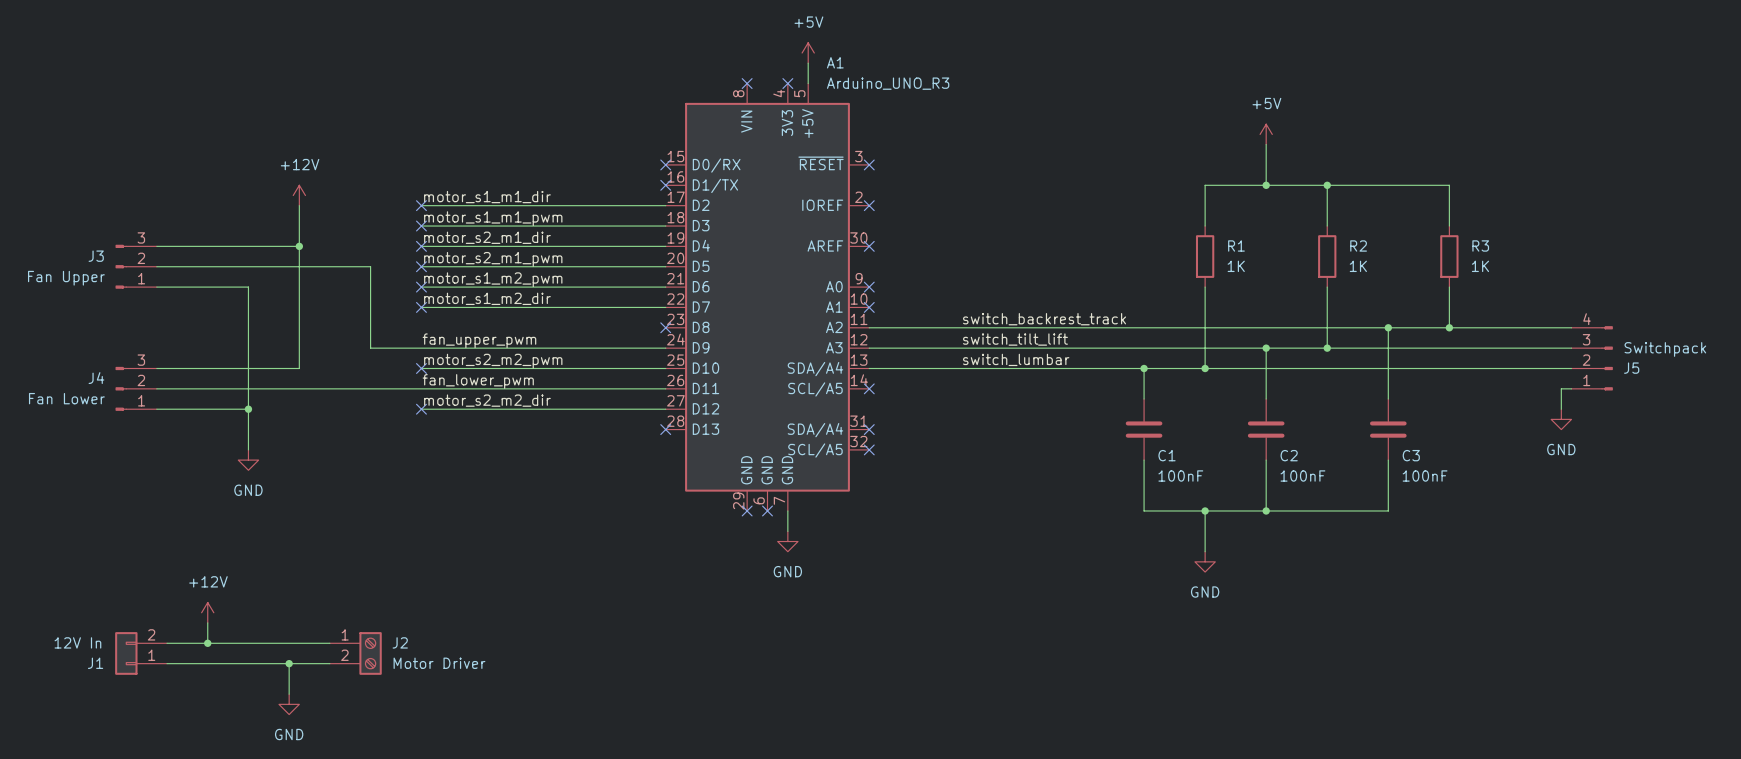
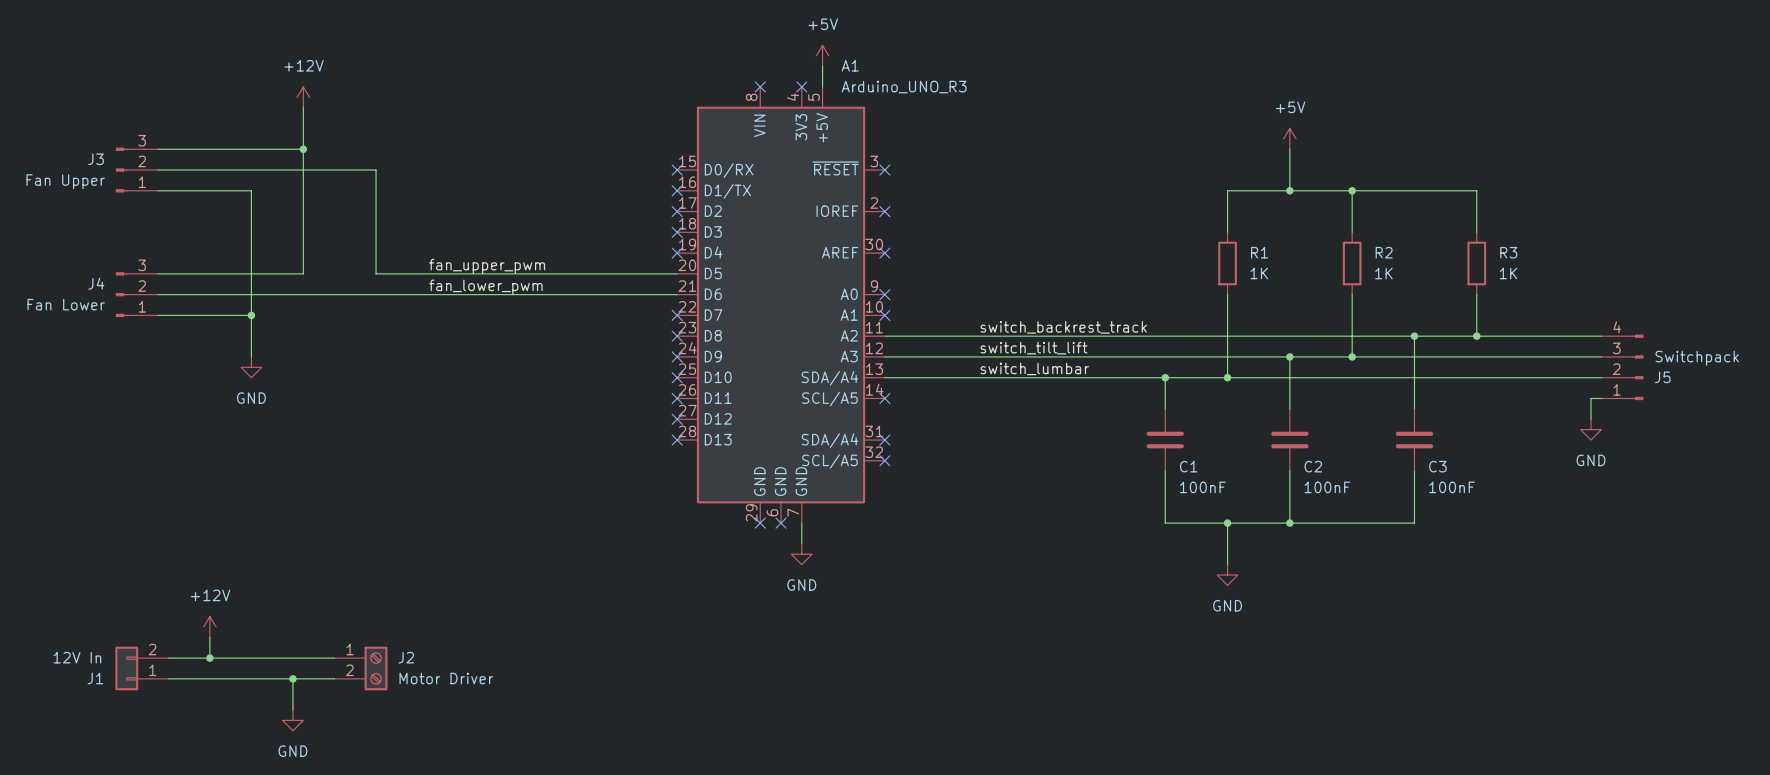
wire: none -> (303, 107) (303, 211)
junction: none -> (303, 149)
wire: none -> (157, 170) (376, 170) (376, 273) (427, 273)
wire: none -> (157, 190) (251, 190) (251, 294) (427, 294)
power symbol position: +12V (299, 195) -> +12V (303, 97)
label: motor_s1_m1_dir (487, 197) -> none
wire: (421, 205) (665, 205) -> none
no-connect mark: (421, 205) -> none
no-connect mark: none -> (677, 211)
label: motor_s1_m1_pwm (493, 218) -> none
wire: (421, 226) (665, 226) -> none
no-connect mark: (421, 226) -> none
no-connect mark: none -> (677, 232)
label: motor_s2_m1_dir (487, 237) -> none
wire: (156, 246) (299, 246) -> (157, 149) (303, 149)
junction: (299, 246) -> none
wire: (421, 246) (665, 246) -> none
no-connect mark: (421, 246) -> none
no-connect mark: none -> (677, 253)
label: motor_s2_m1_pwm (493, 259) -> fan_upper_pwm (487, 266)
J3 position: (136, 266) -> (136, 170)
no-connect mark: (421, 266) -> none
label: motor_s1_m2_pwm (493, 279) -> fan_lower_pwm (485, 287)
no-connect mark: (421, 287) -> none
label: motor_s1_m2_dir (487, 298) -> none
junction: none -> (251, 315)
wire: (421, 307) (665, 307) -> none
no-connect mark: (421, 307) -> none
no-connect mark: none -> (677, 315)
label: fan_upper_pwm (479, 340) -> none
wire: (248, 348) (248, 449) -> none
wire: (665, 348) (370, 348) (370, 266) (299, 266) (299, 368) (156, 368) -> none
no-connect mark: none -> (677, 356)
label: motor_s2_m2_pwm (493, 361) -> none
wire: (421, 368) (665, 368) -> none
no-connect mark: (421, 368) -> none
no-connect mark: none -> (677, 377)
label: fan_lower_pwm (478, 381) -> none
J4 position: (136, 388) -> (136, 294)
wire: (156, 388) (665, 388) -> none
no-connect mark: none -> (677, 398)
label: motor_s2_m2_dir (487, 400) -> none
wire: (156, 409) (248, 409) -> (157, 315) (251, 315)
junction: (248, 409) -> none
wire: (421, 409) (665, 409) -> none
no-connect mark: (421, 409) -> none
no-connect mark: none -> (677, 419)
power symbol position: GND (248, 460) -> GND (251, 367)

